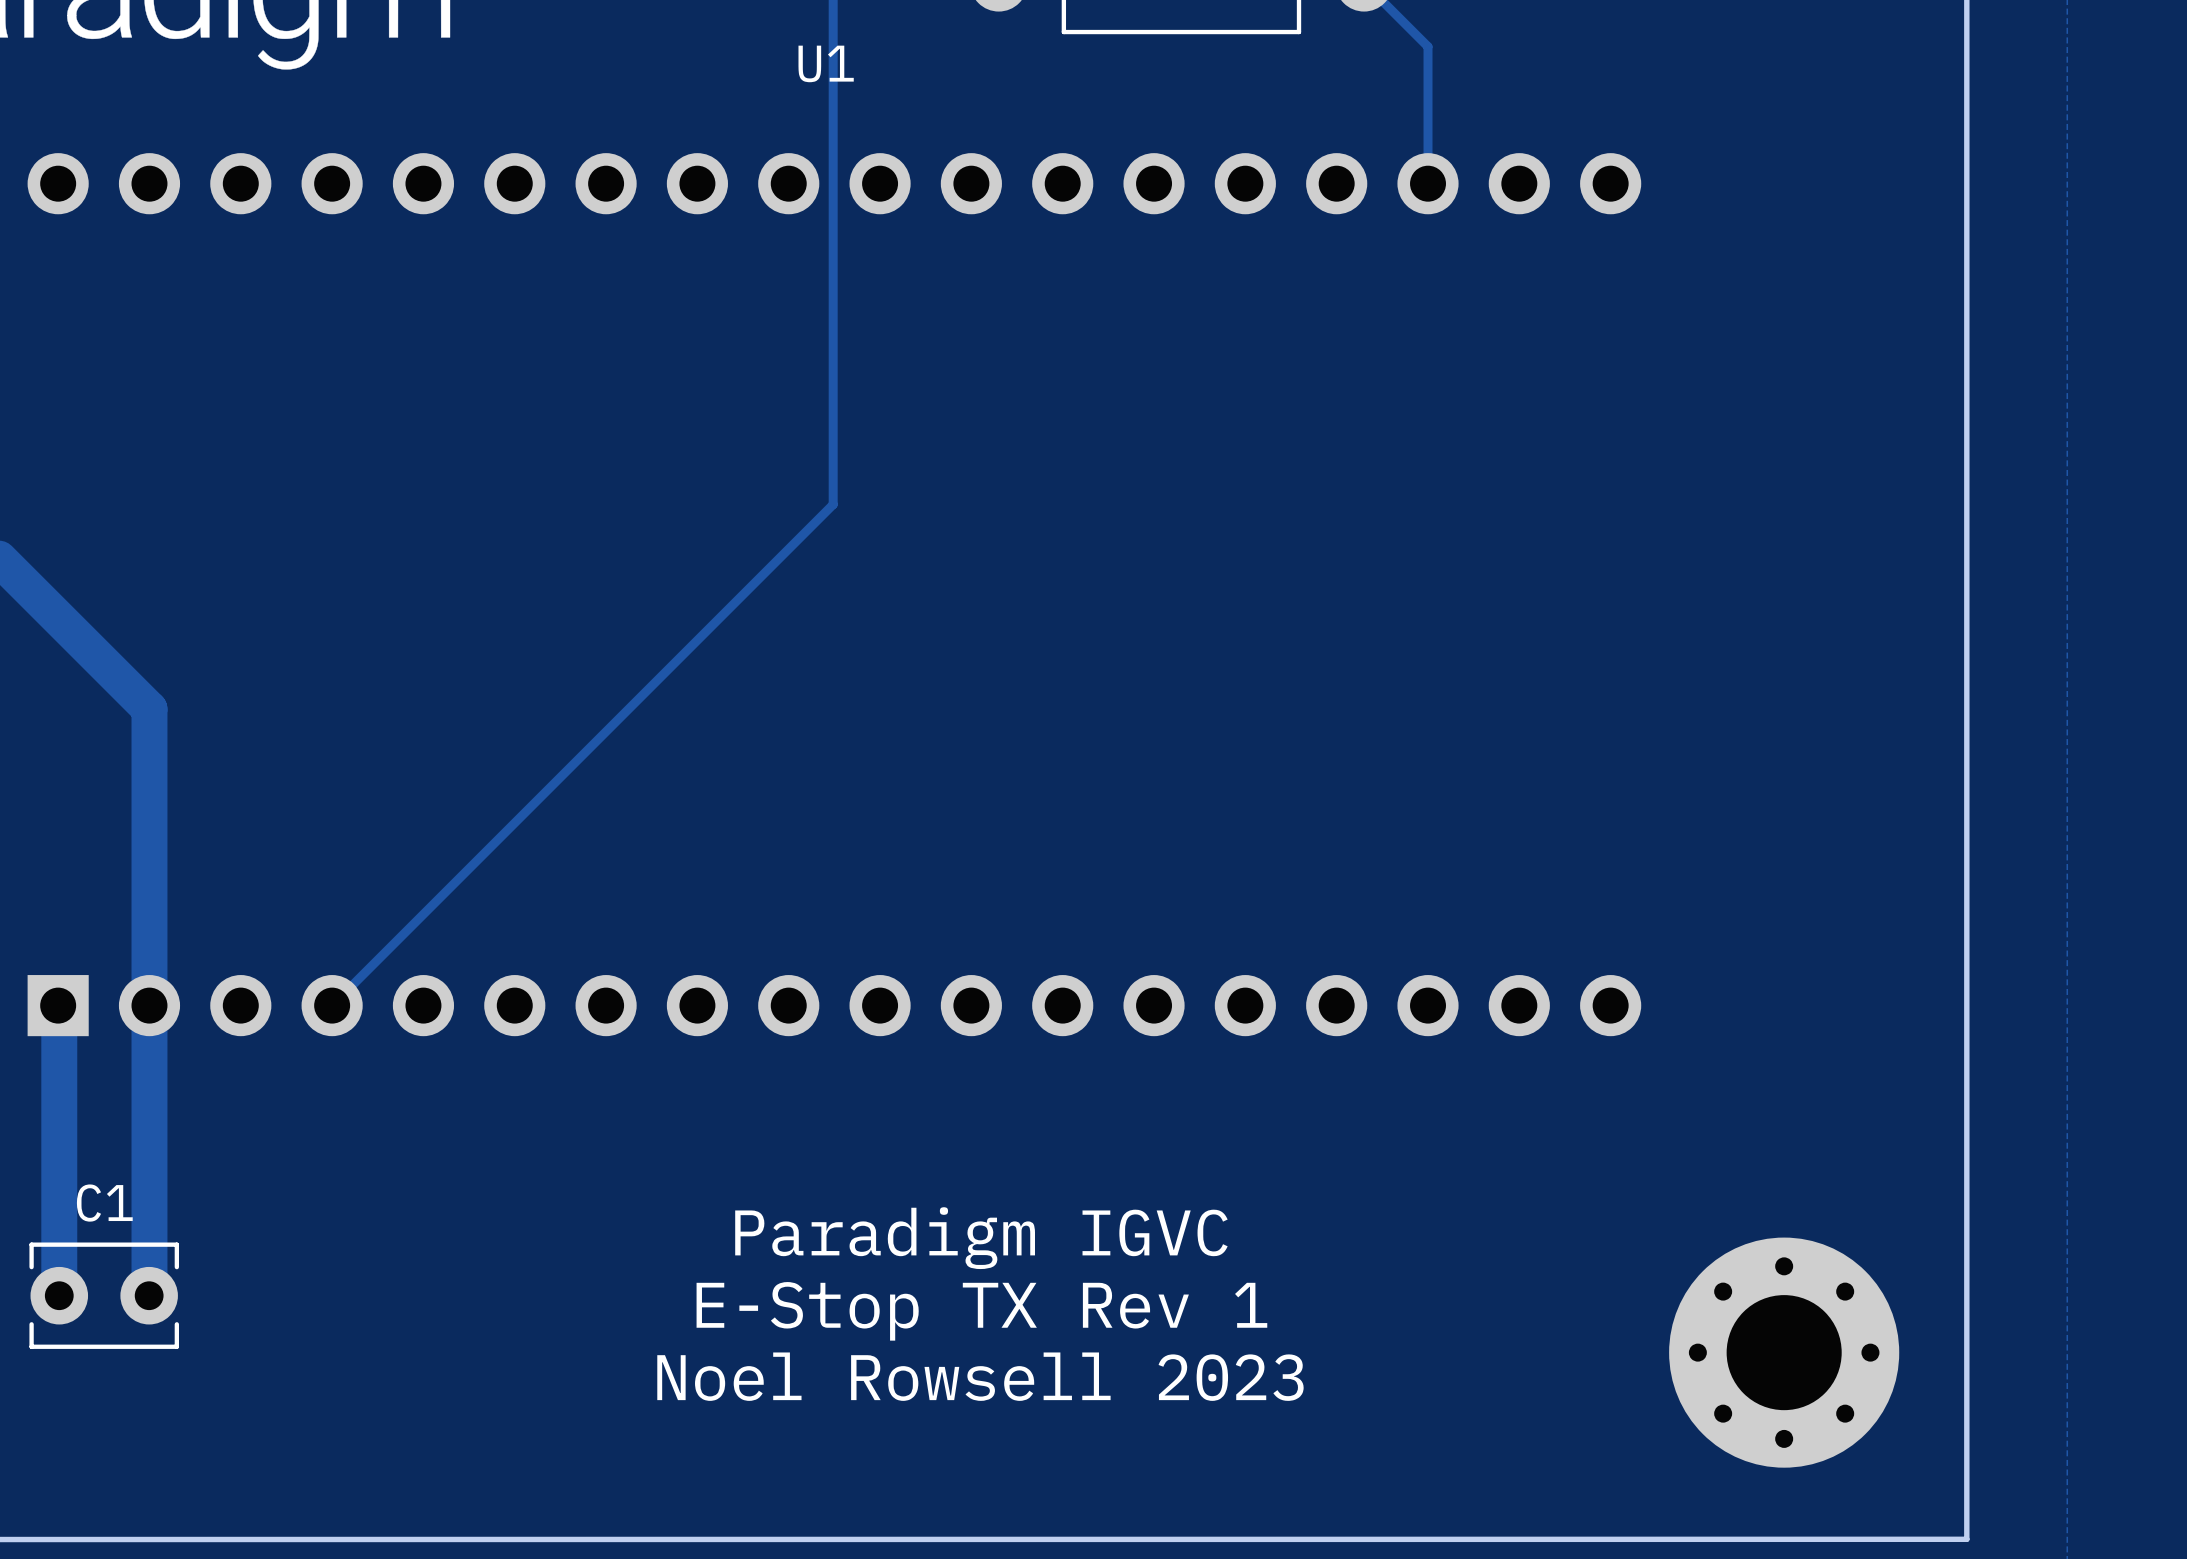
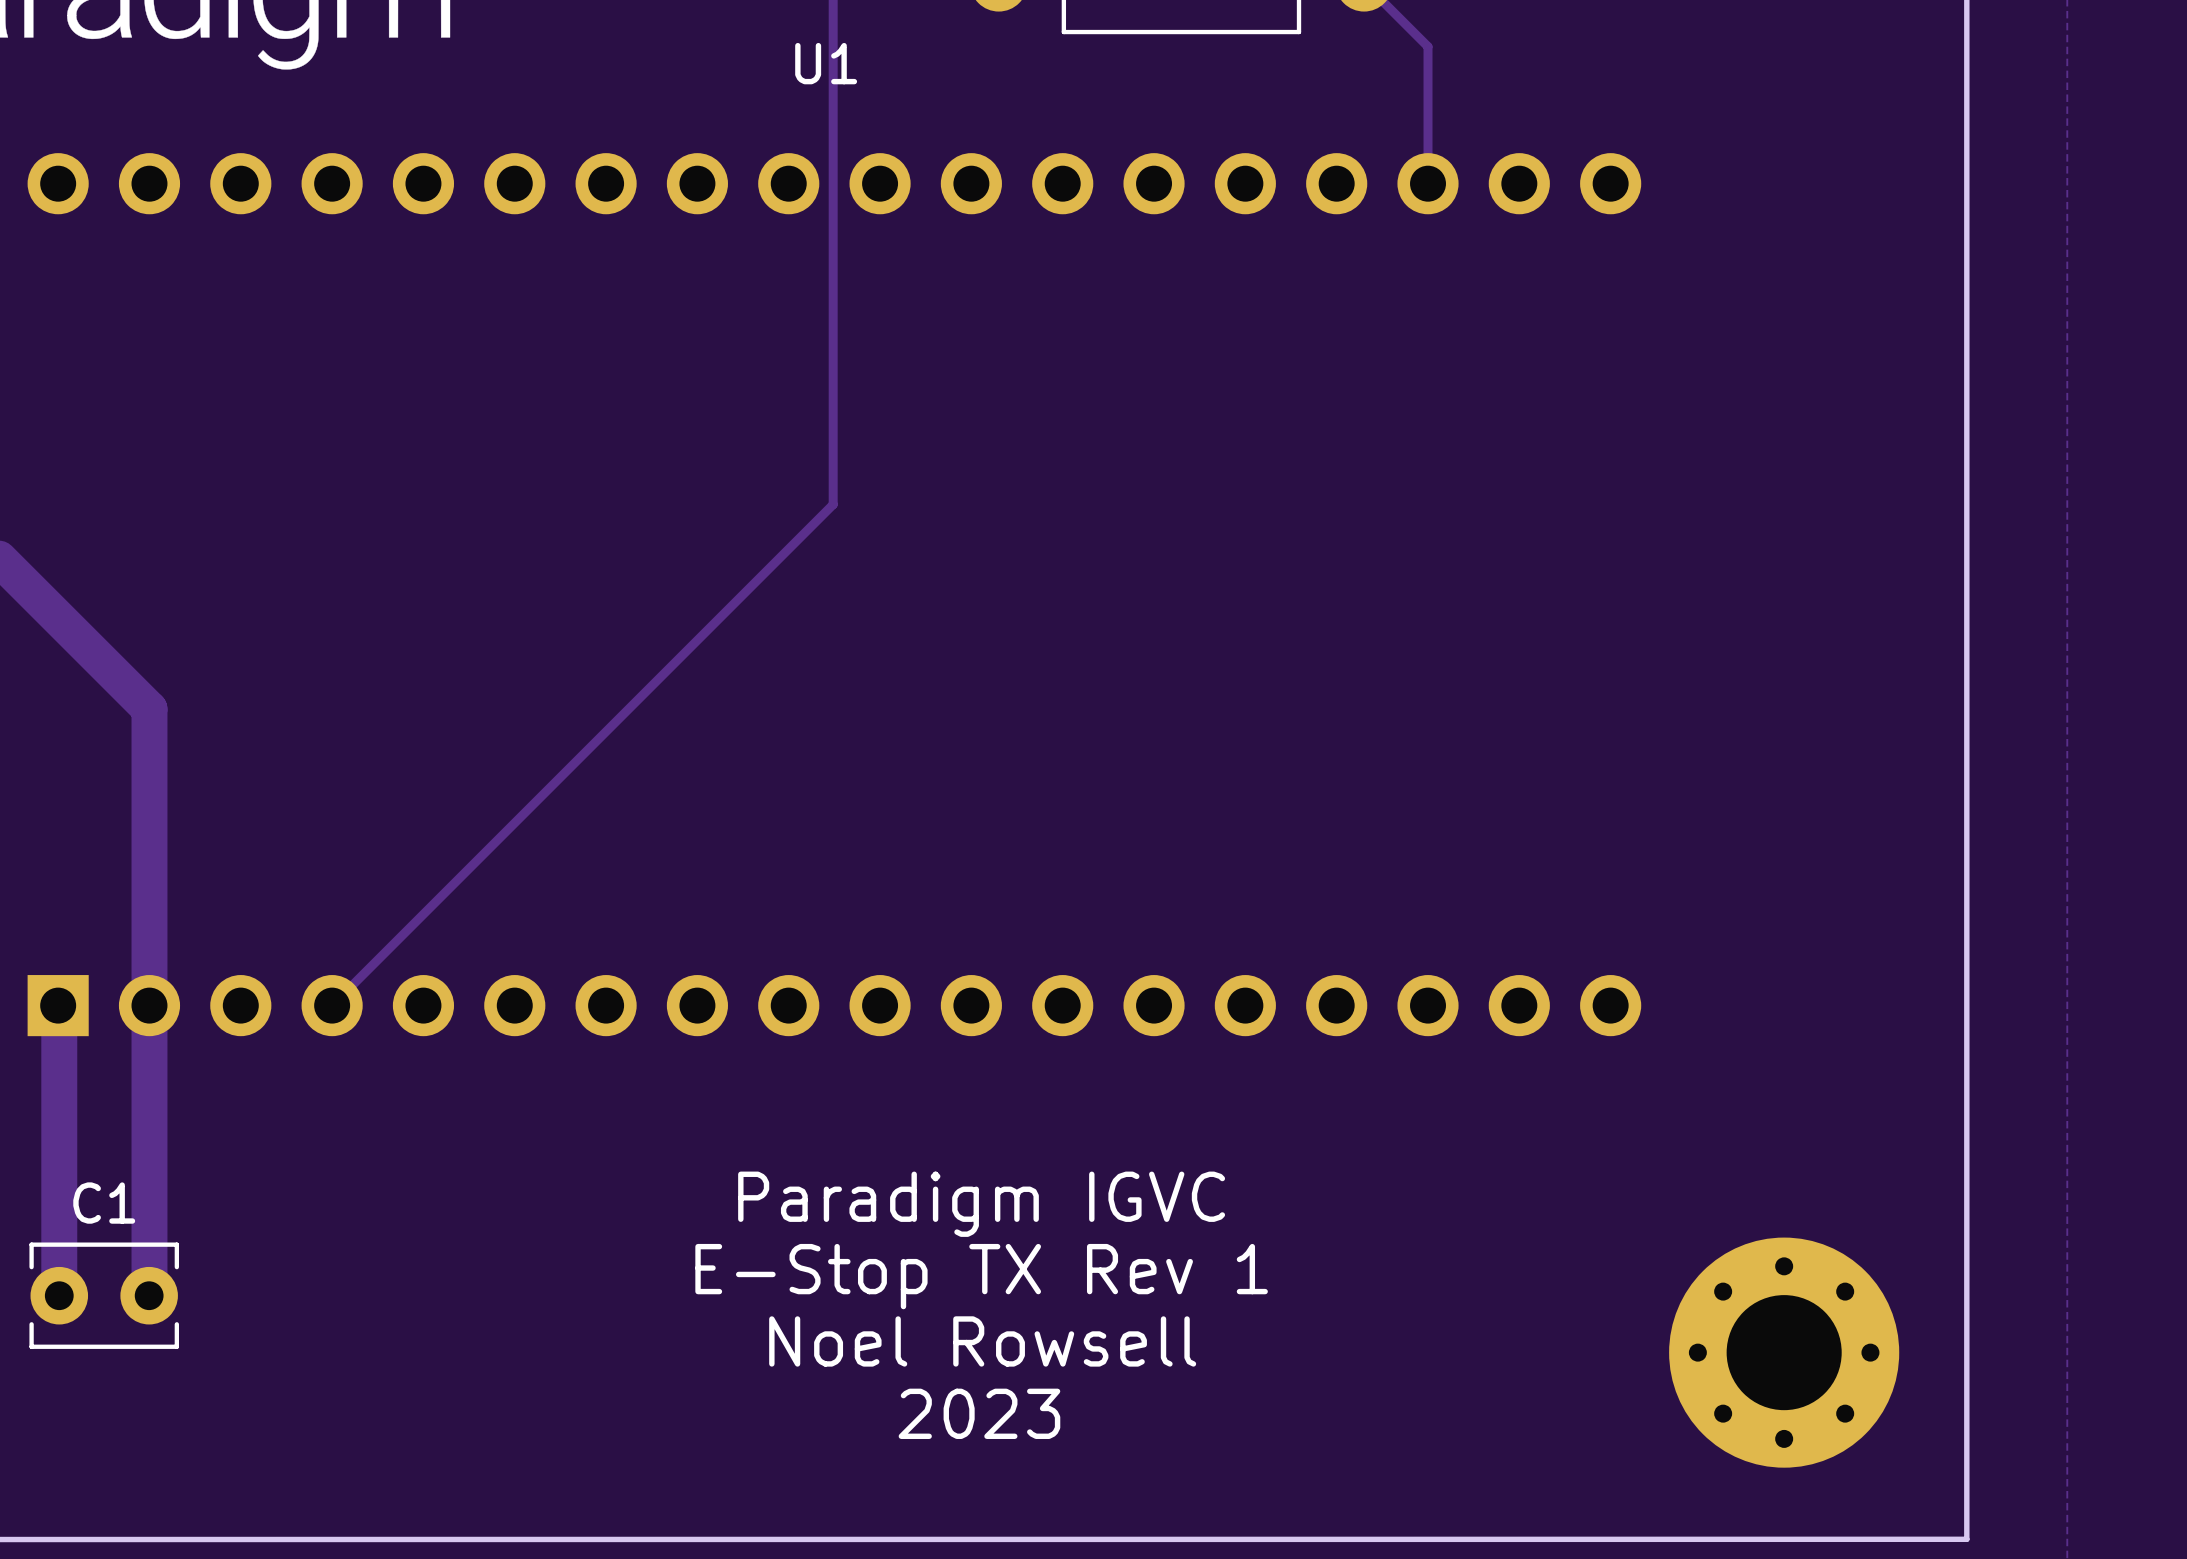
text position: Paradigm IGVC (981, 1238) -> Paradigm IGVC (981, 1204)
text position: E-Stop TX Rev 1 (981, 1311) -> E-Stop TX Rev 1 (981, 1276)
text: Noel Rowsell 2023 (980, 1376) -> Noel Rowsell (982, 1341)
text: none -> 2023 (979, 1413)

